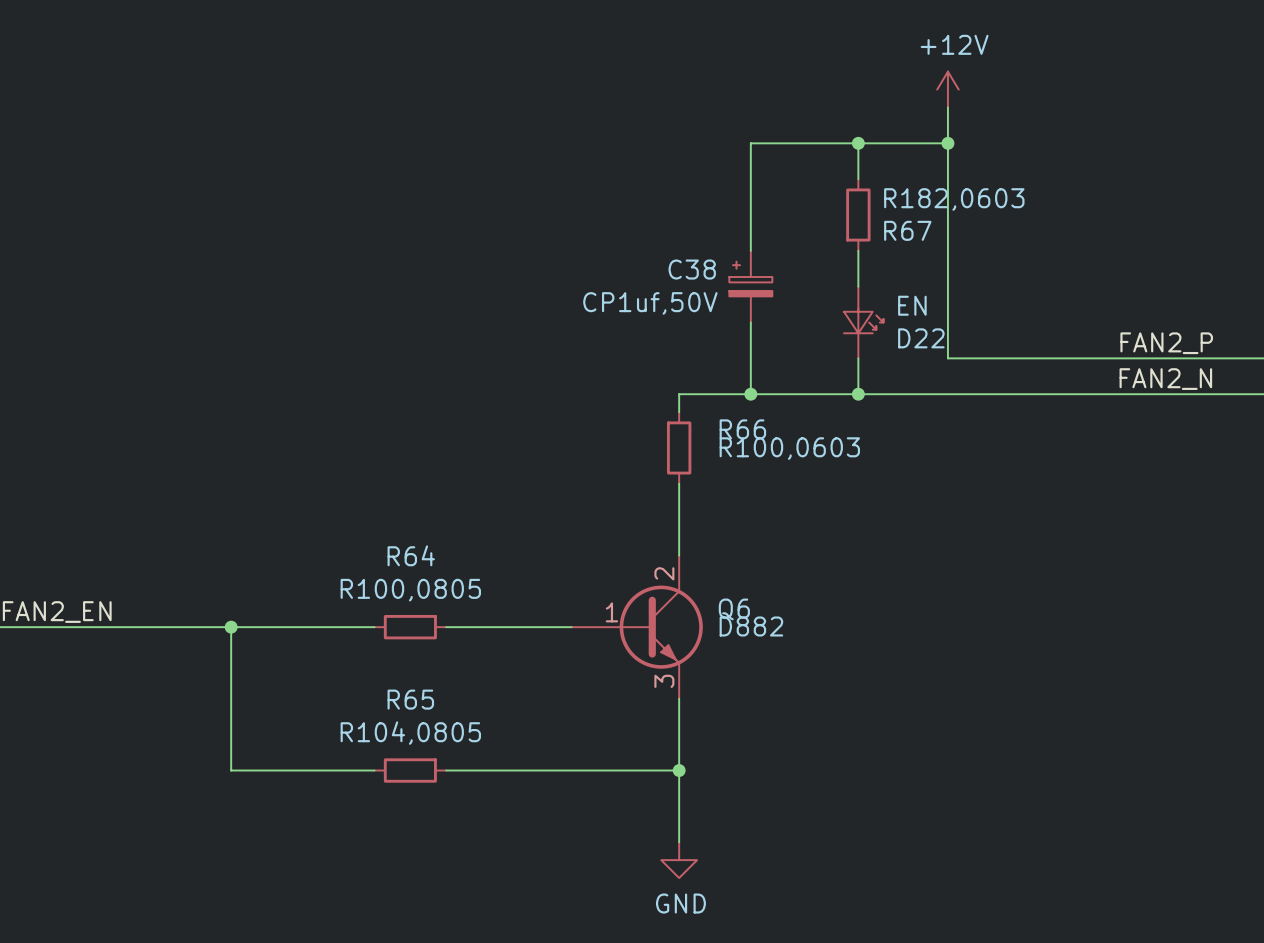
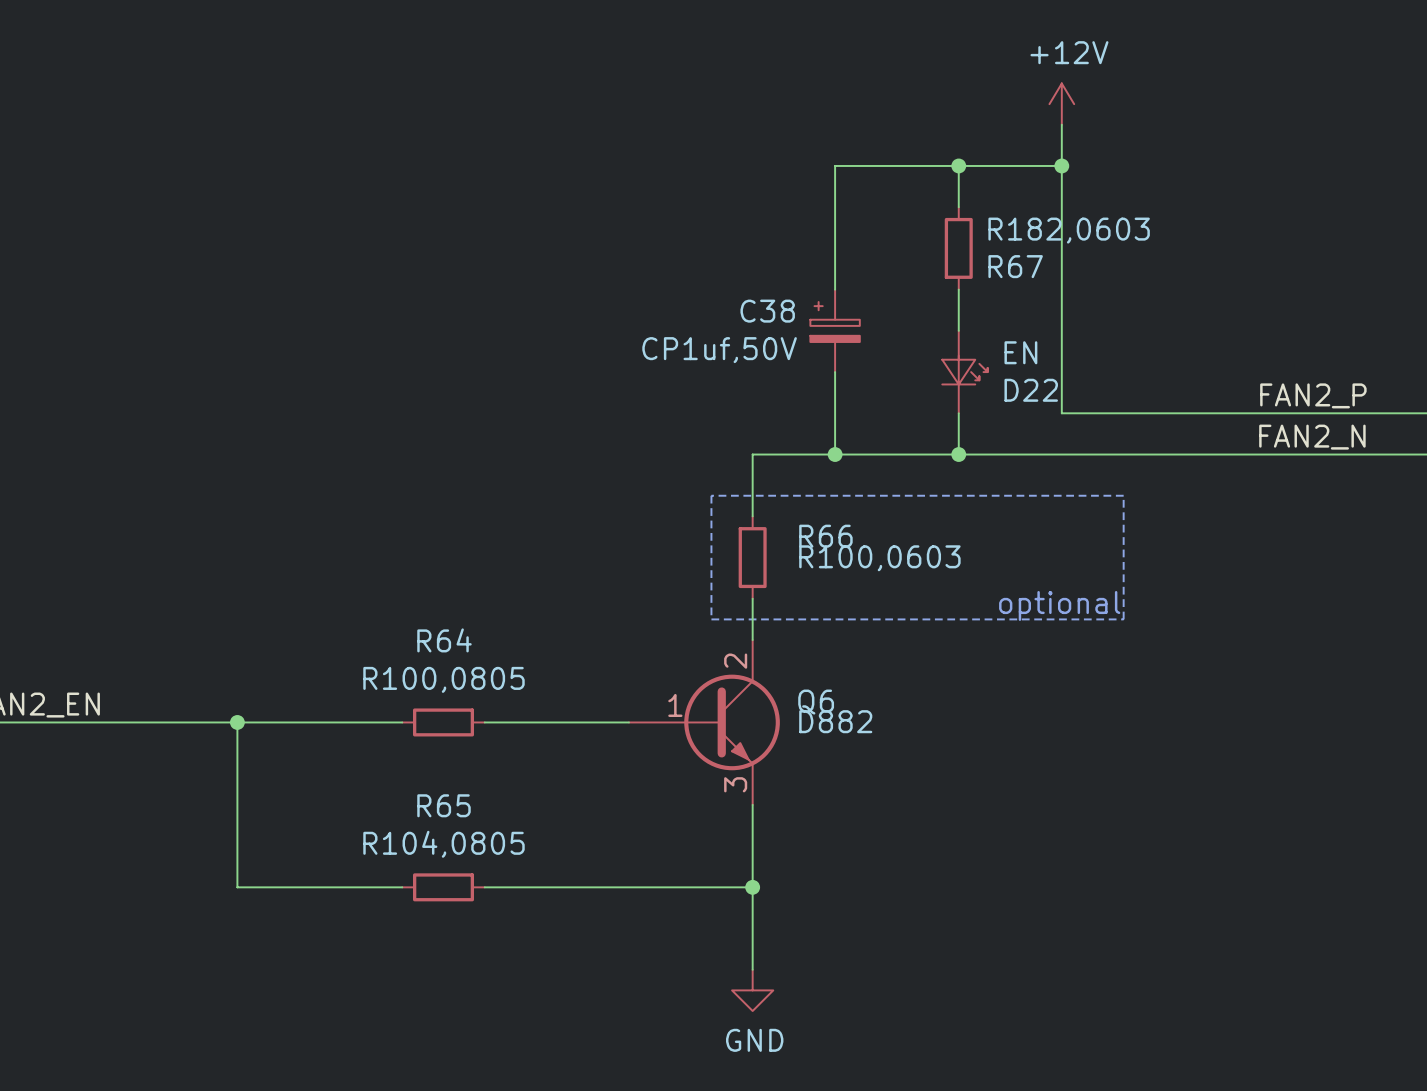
line: none -> (711, 495) (1123, 495) (1123, 619) (711, 619) (711, 495)
R66 position: (679, 447) -> (752, 557)
wire: (679, 483) (679, 519) -> (752, 475) (752, 516)
text: none -> optional (1059, 605)

